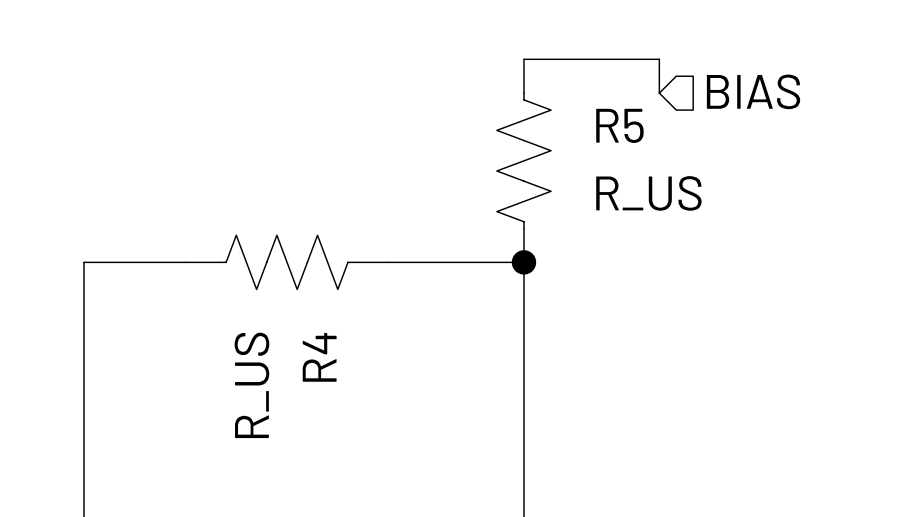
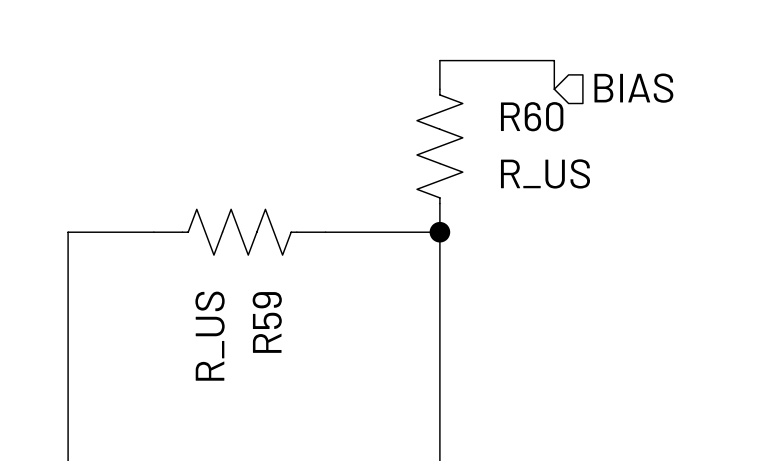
R5 name: R5 (619, 125) -> R60 (532, 116)
R4 name: R4 (319, 357) -> R59 (267, 322)

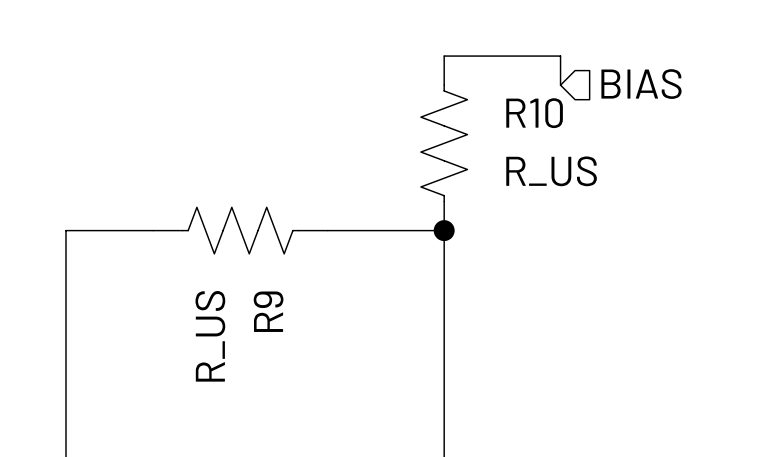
R60 name: R60 (532, 116) -> R10 (534, 113)
R59 name: R59 (267, 322) -> R9 (268, 311)

